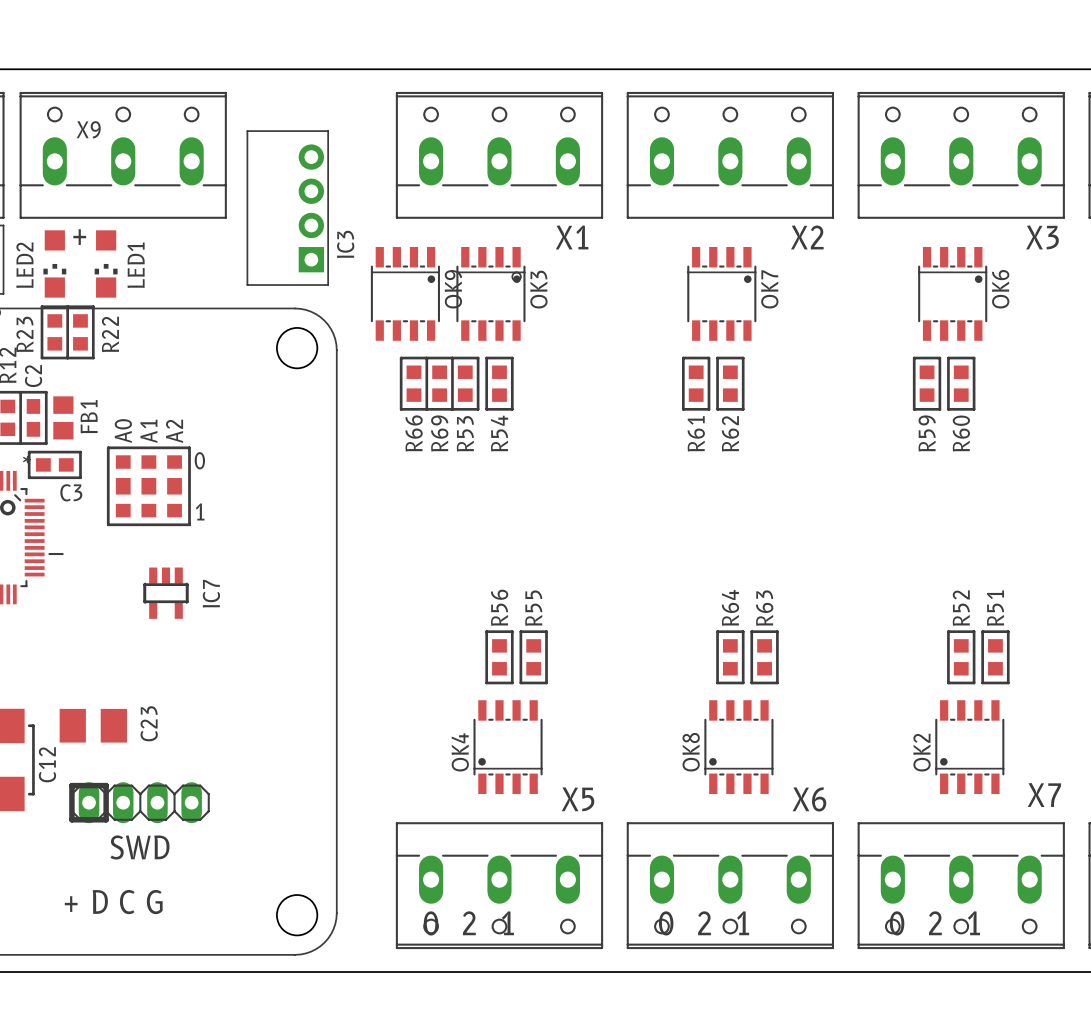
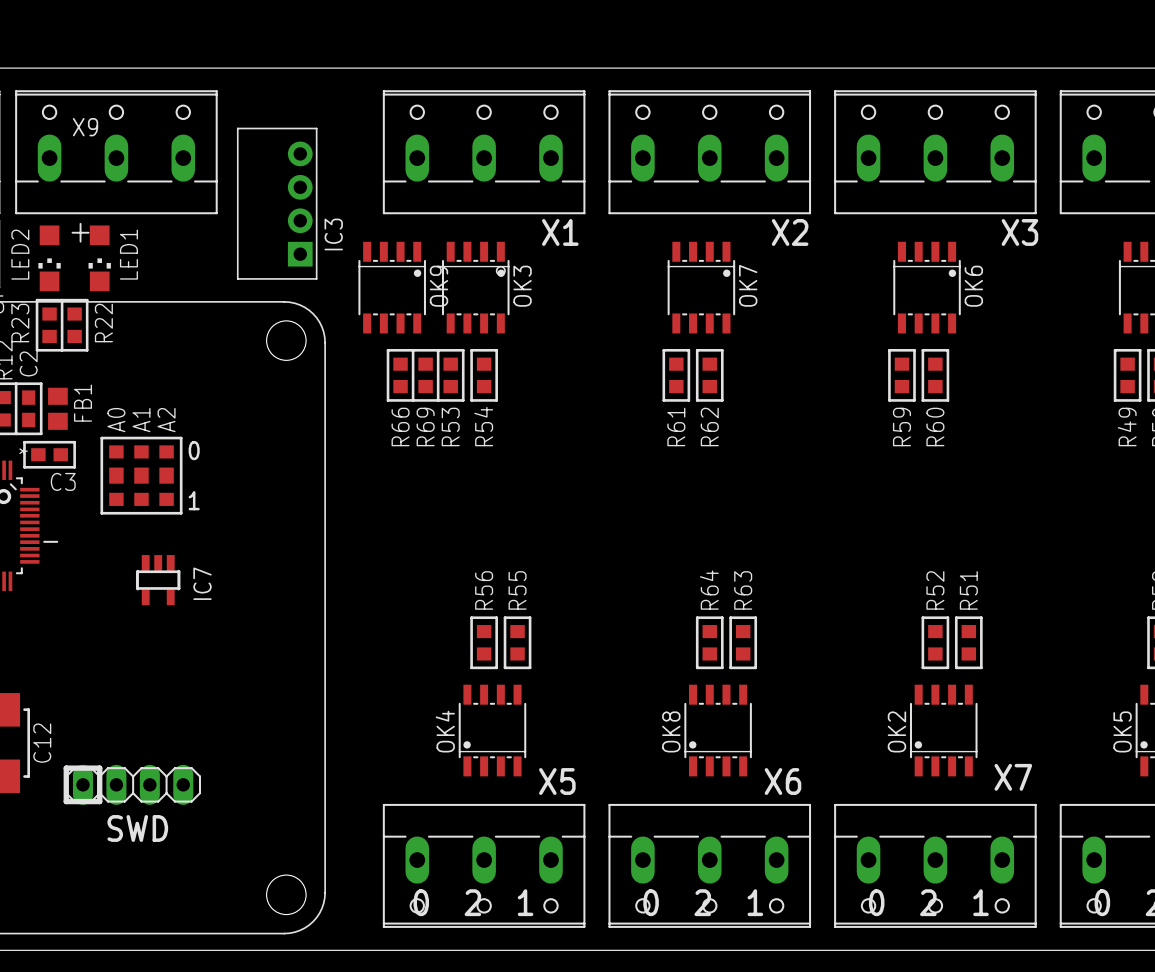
C23: (93, 725) -> none
text: + D C G (113, 902) -> none

